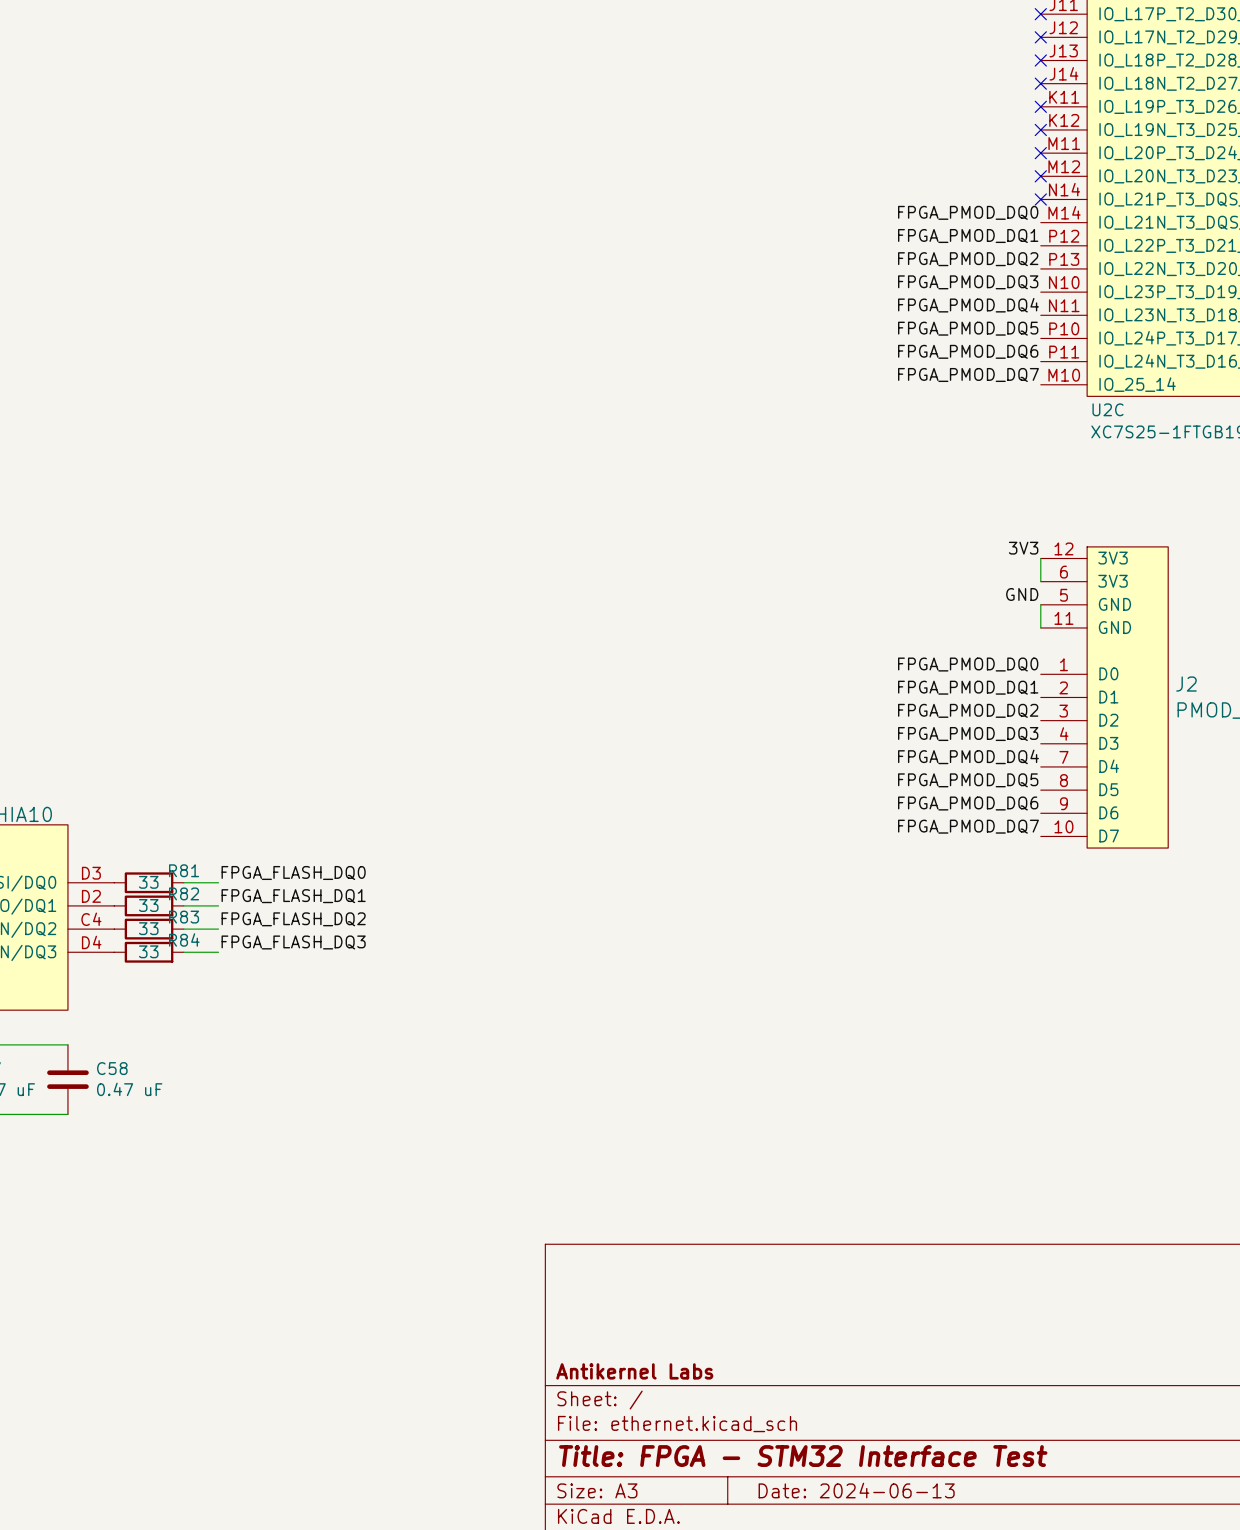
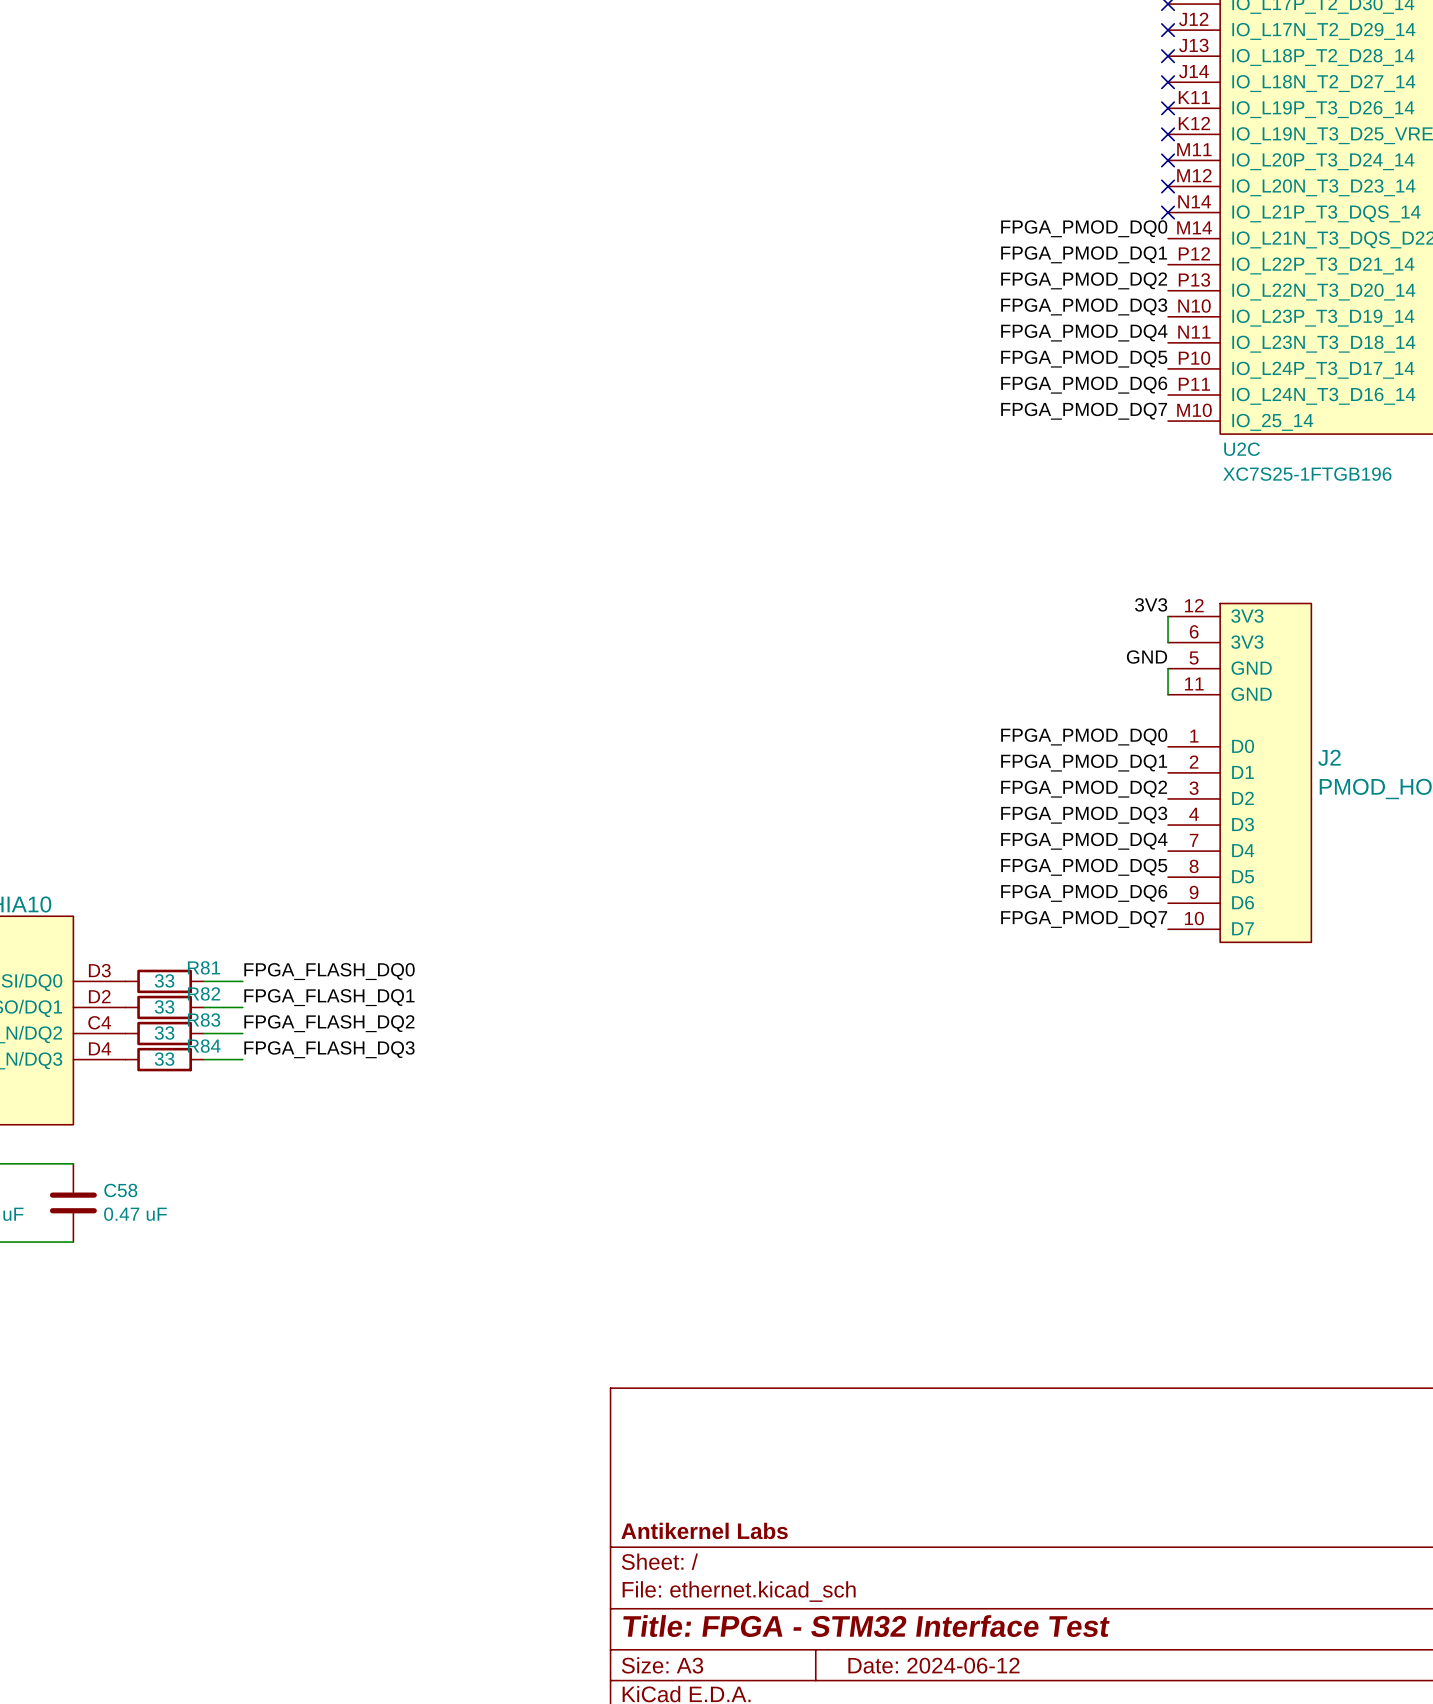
title block: Date: 2024-06-13 (856, 1490) -> Date: 2024-06-12 (933, 1665)

